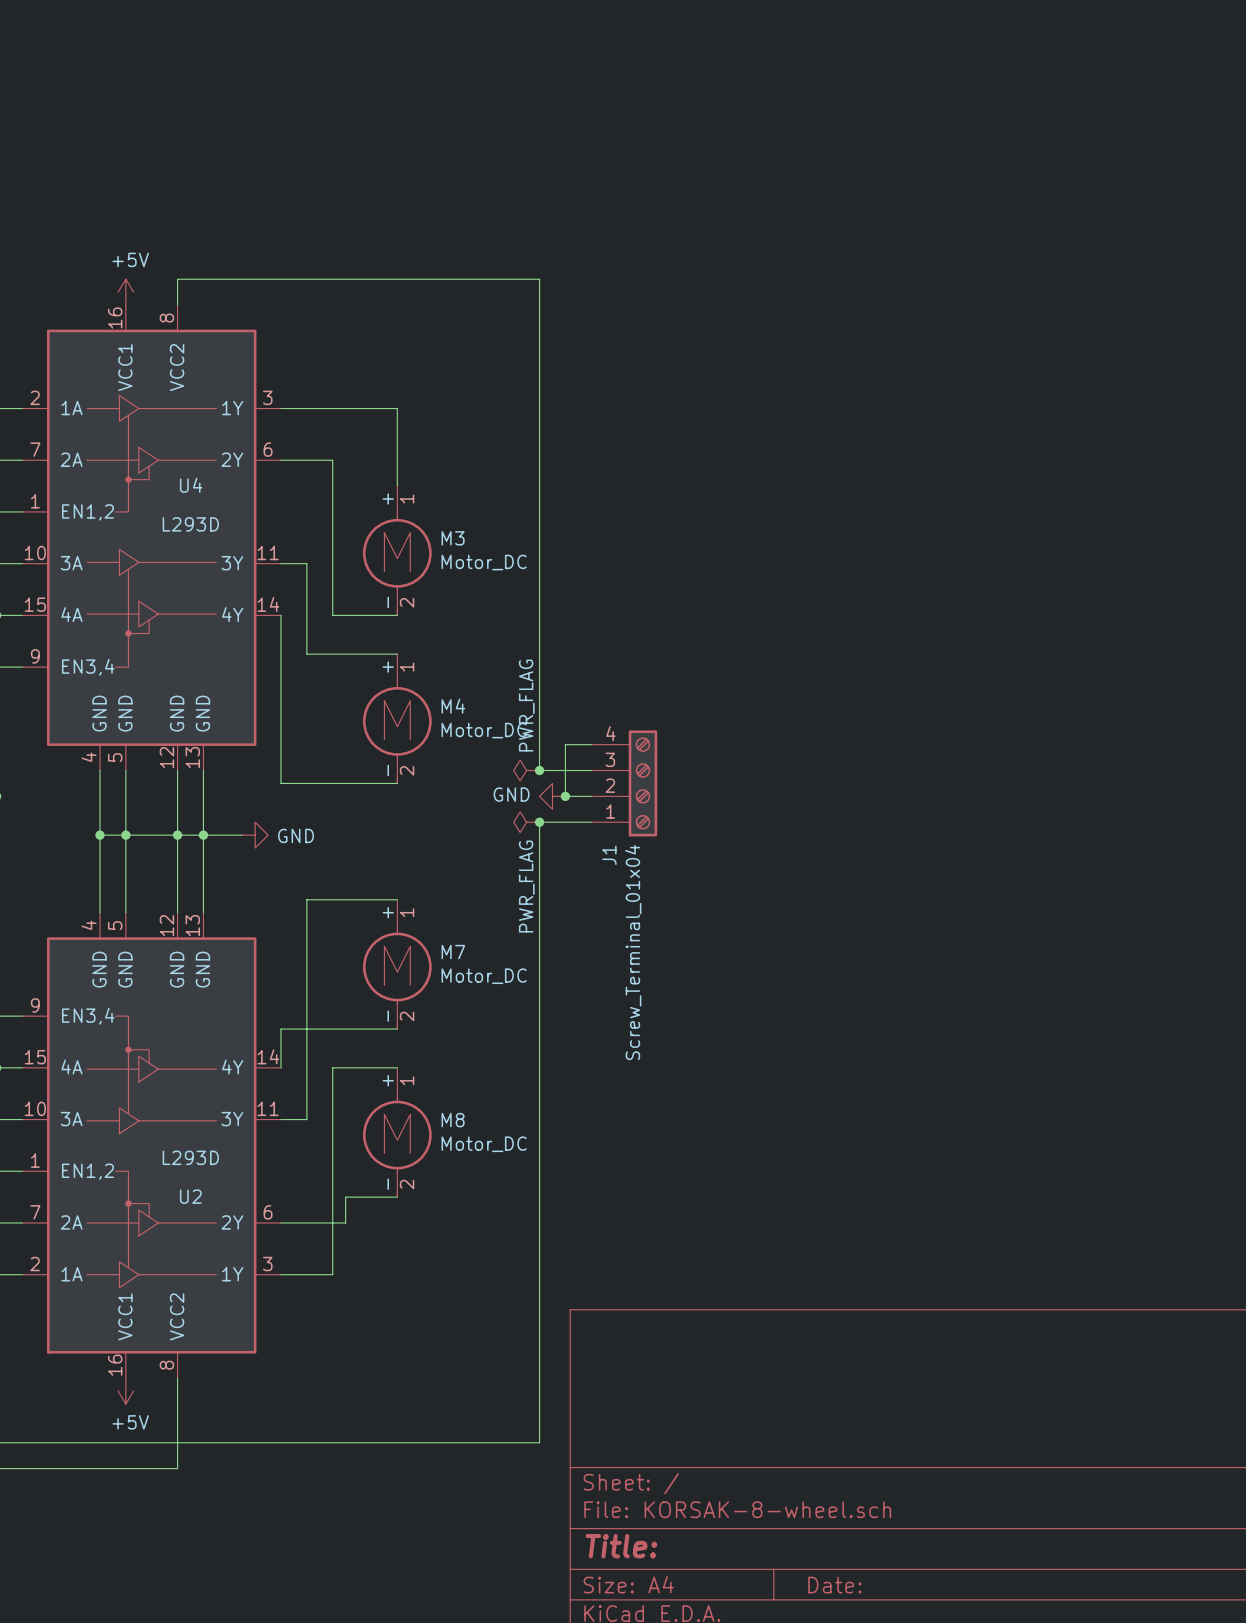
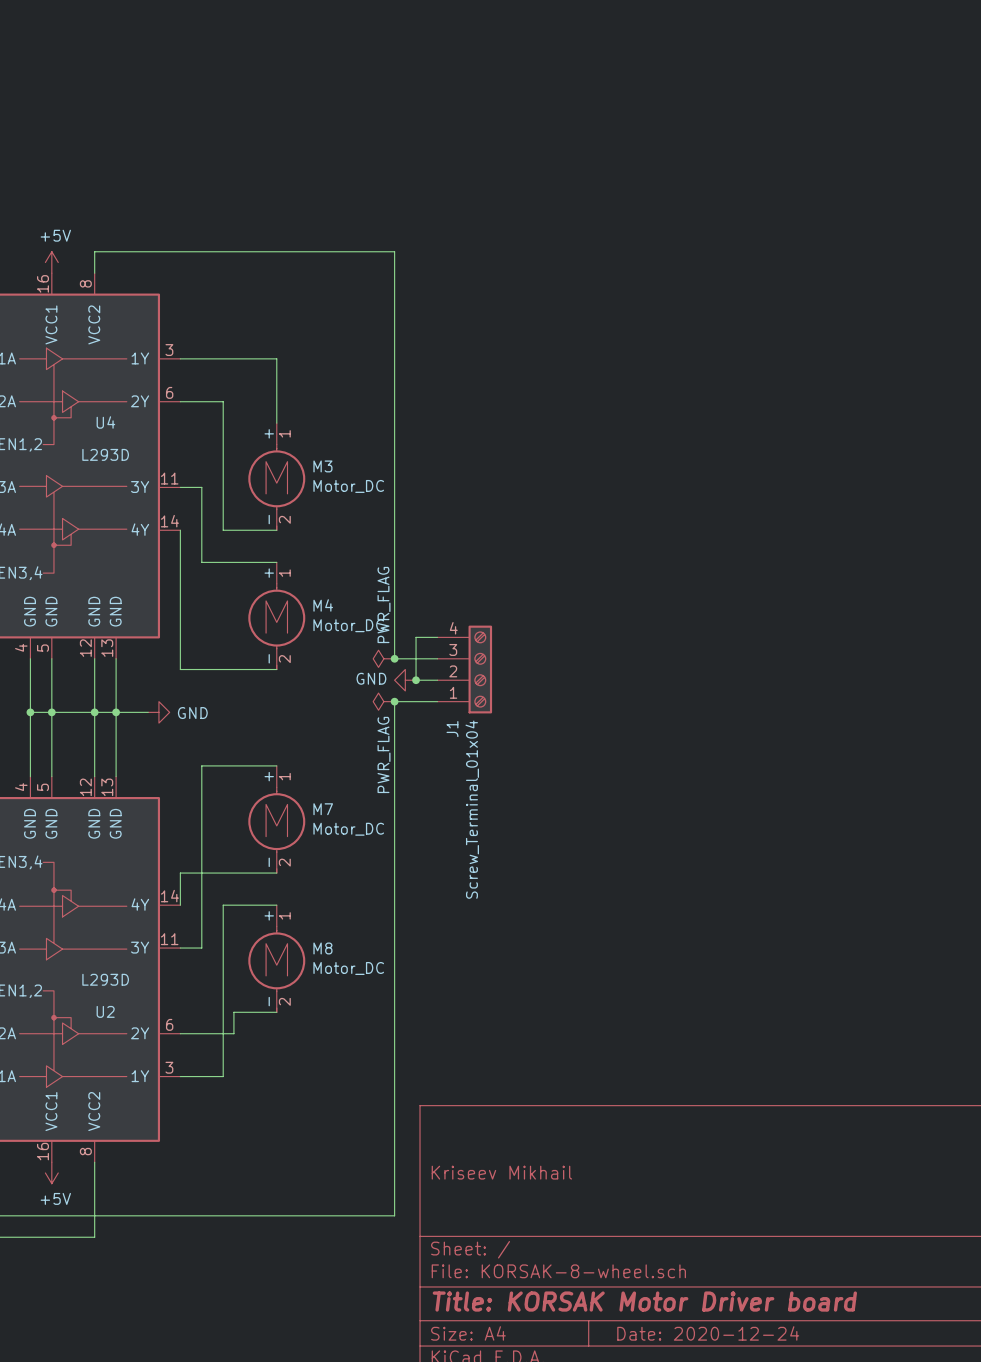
title block: none -> Kriseev Mikhail (501, 1172)
title block: Title: (621, 1546) -> Title: KORSAK Motor Driver board (644, 1301)
title block: Date: (834, 1585) -> Date: 2020-12-24 (708, 1333)

